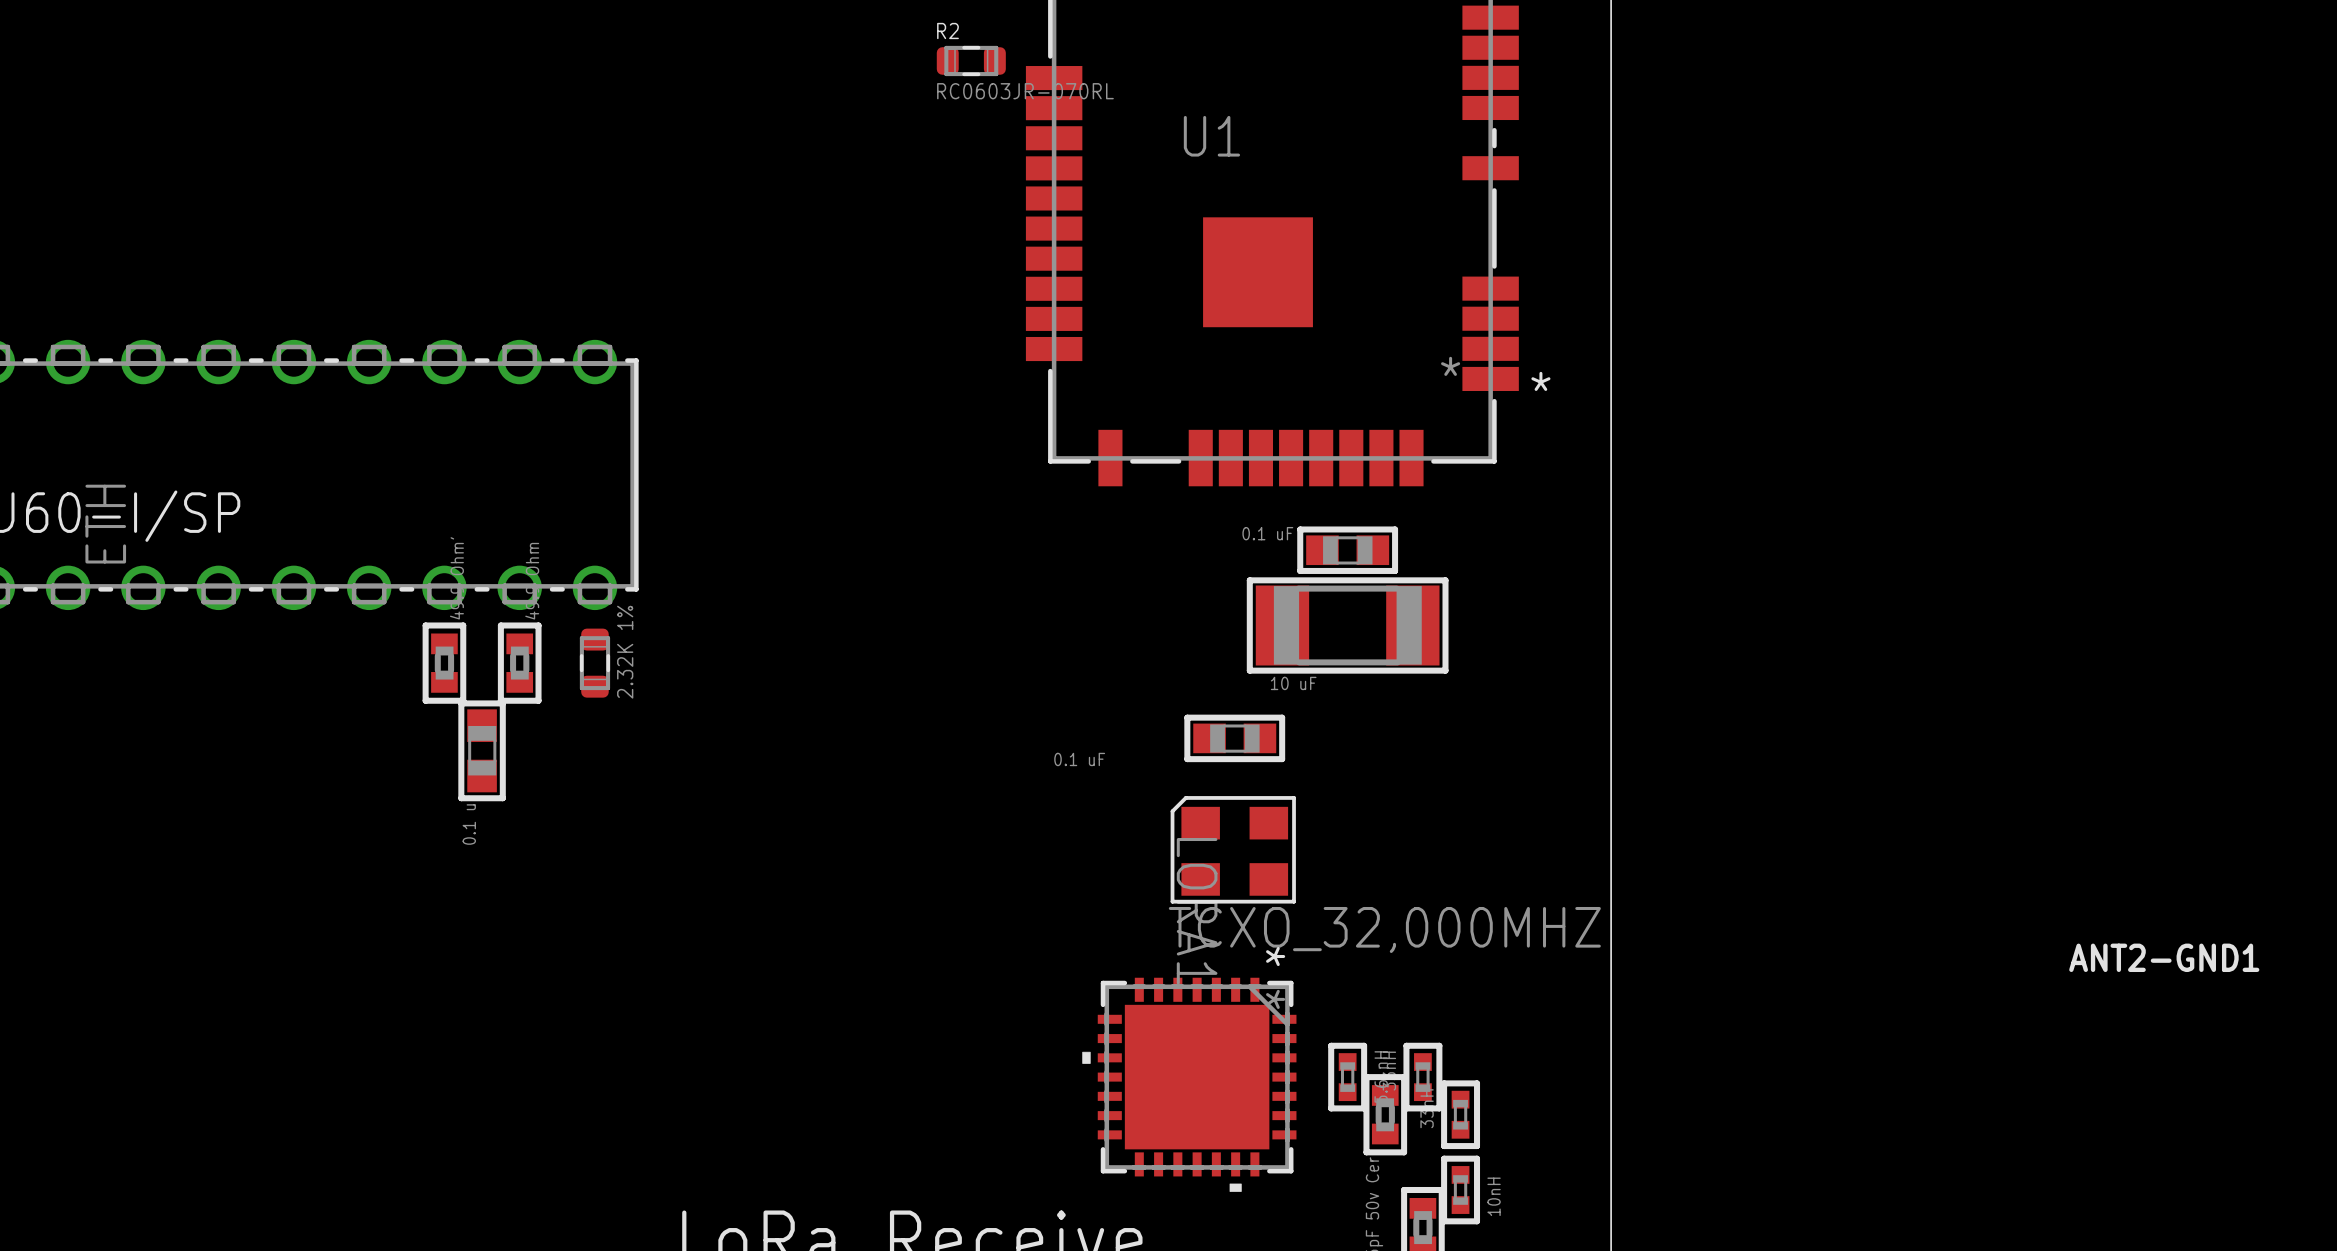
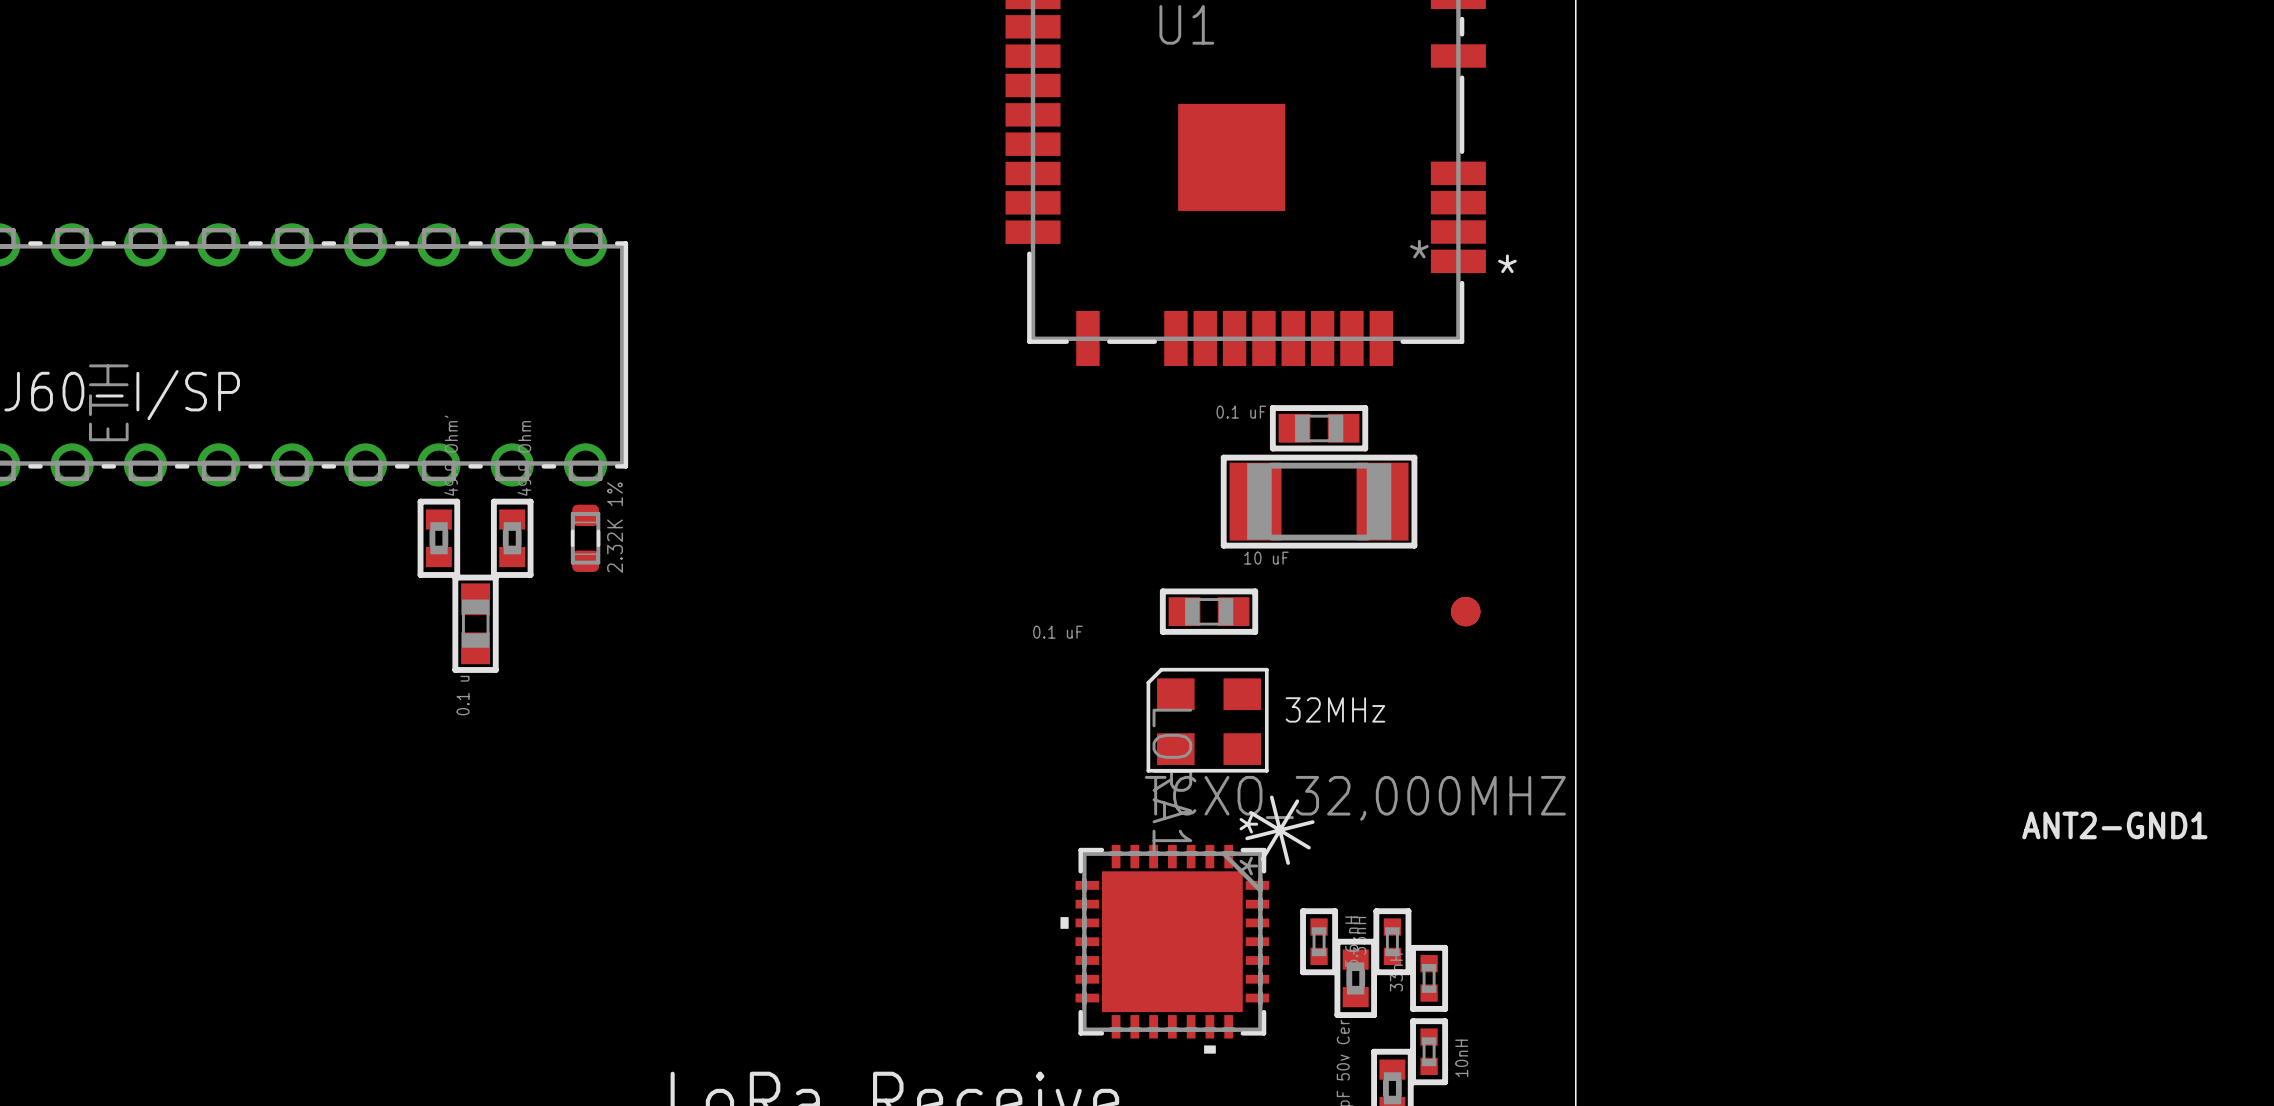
part: none -> (1465, 611)
text: none -> 32MHz (1335, 709)
drawing: none -> [1245, 795, 1315, 865]

